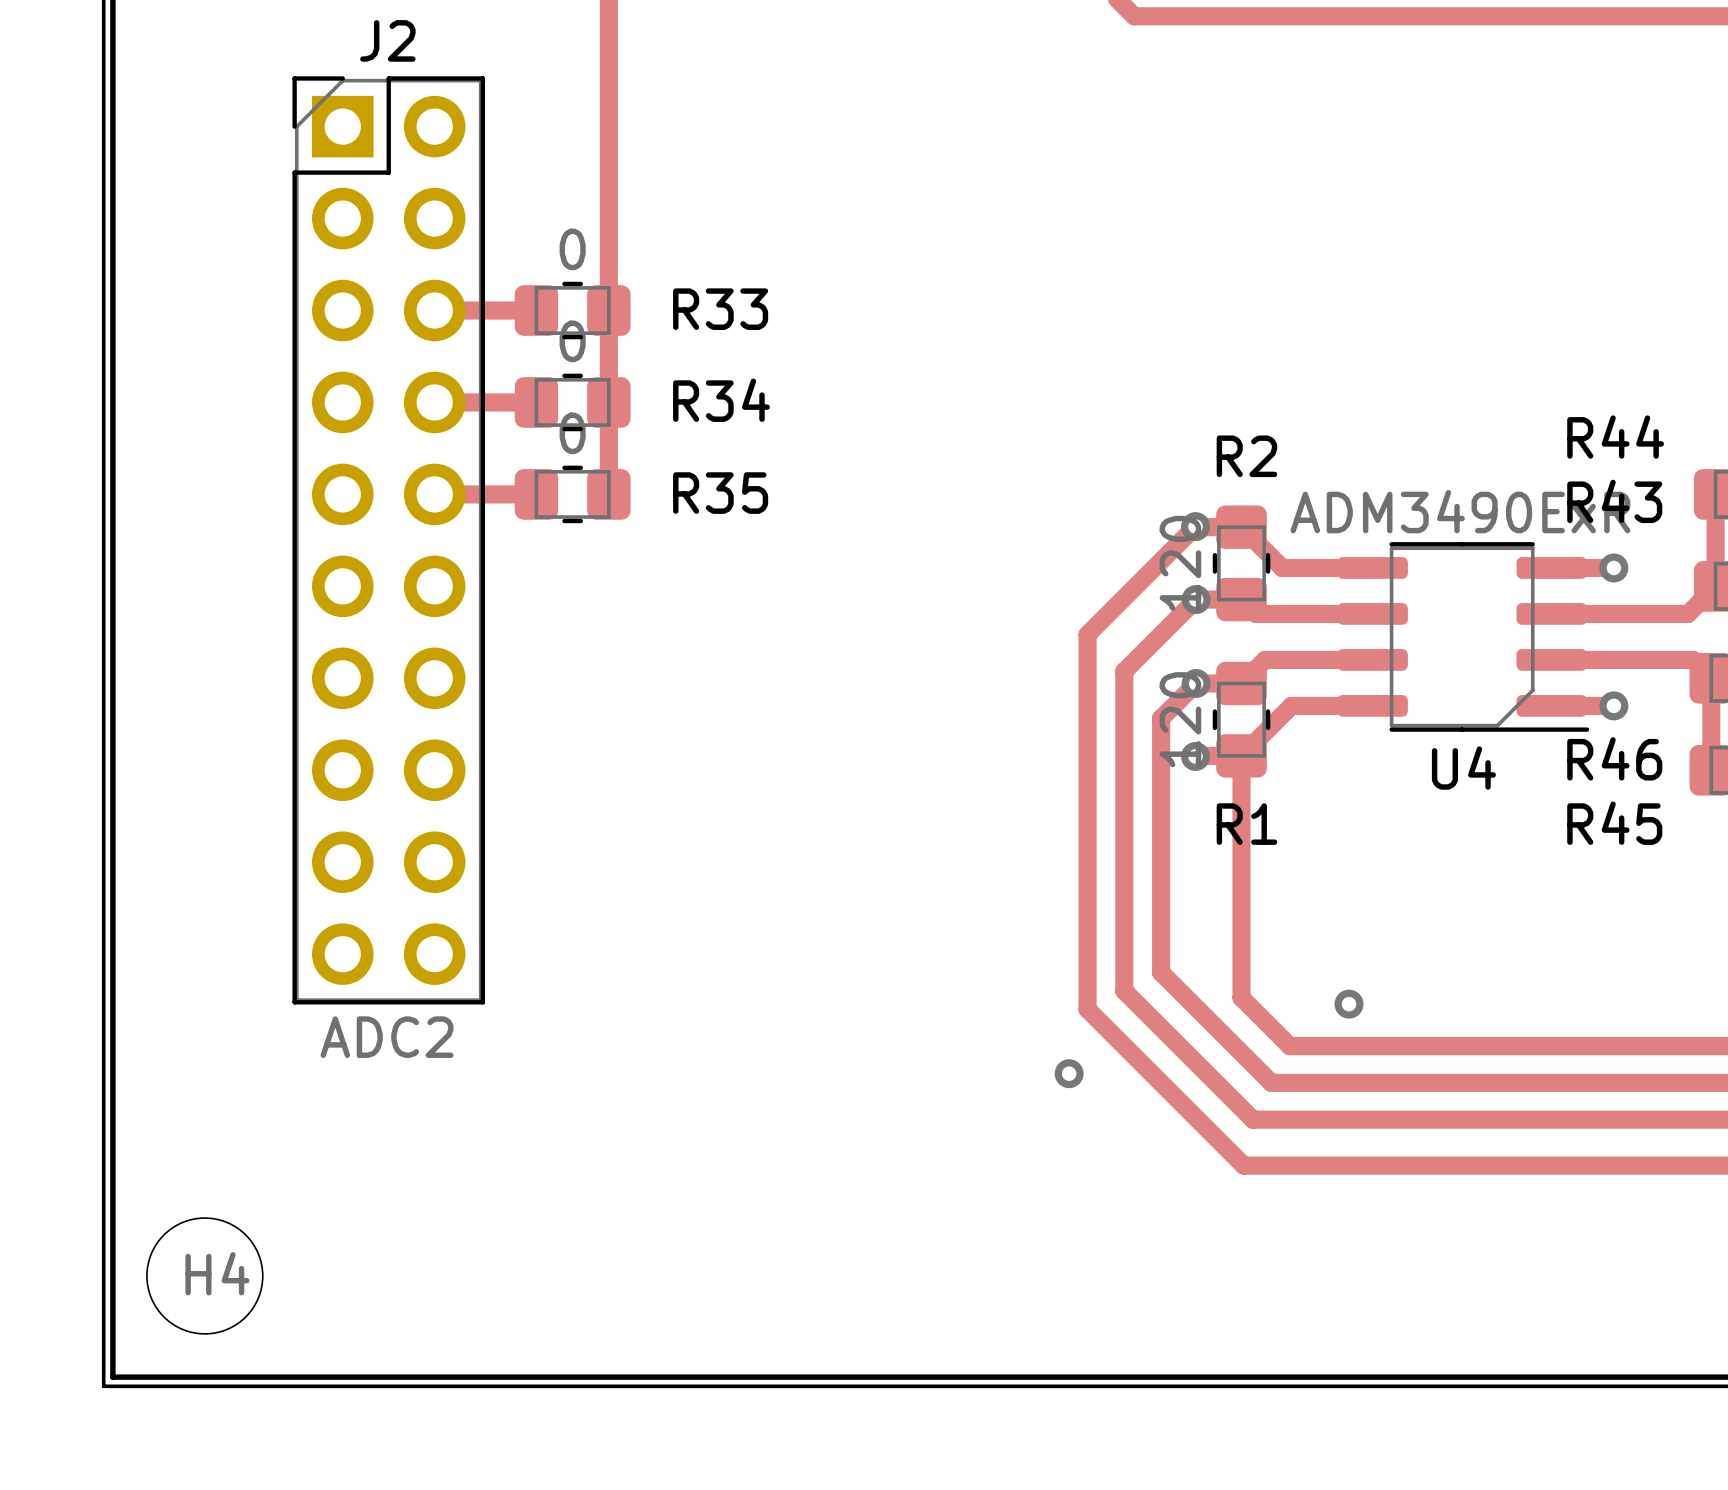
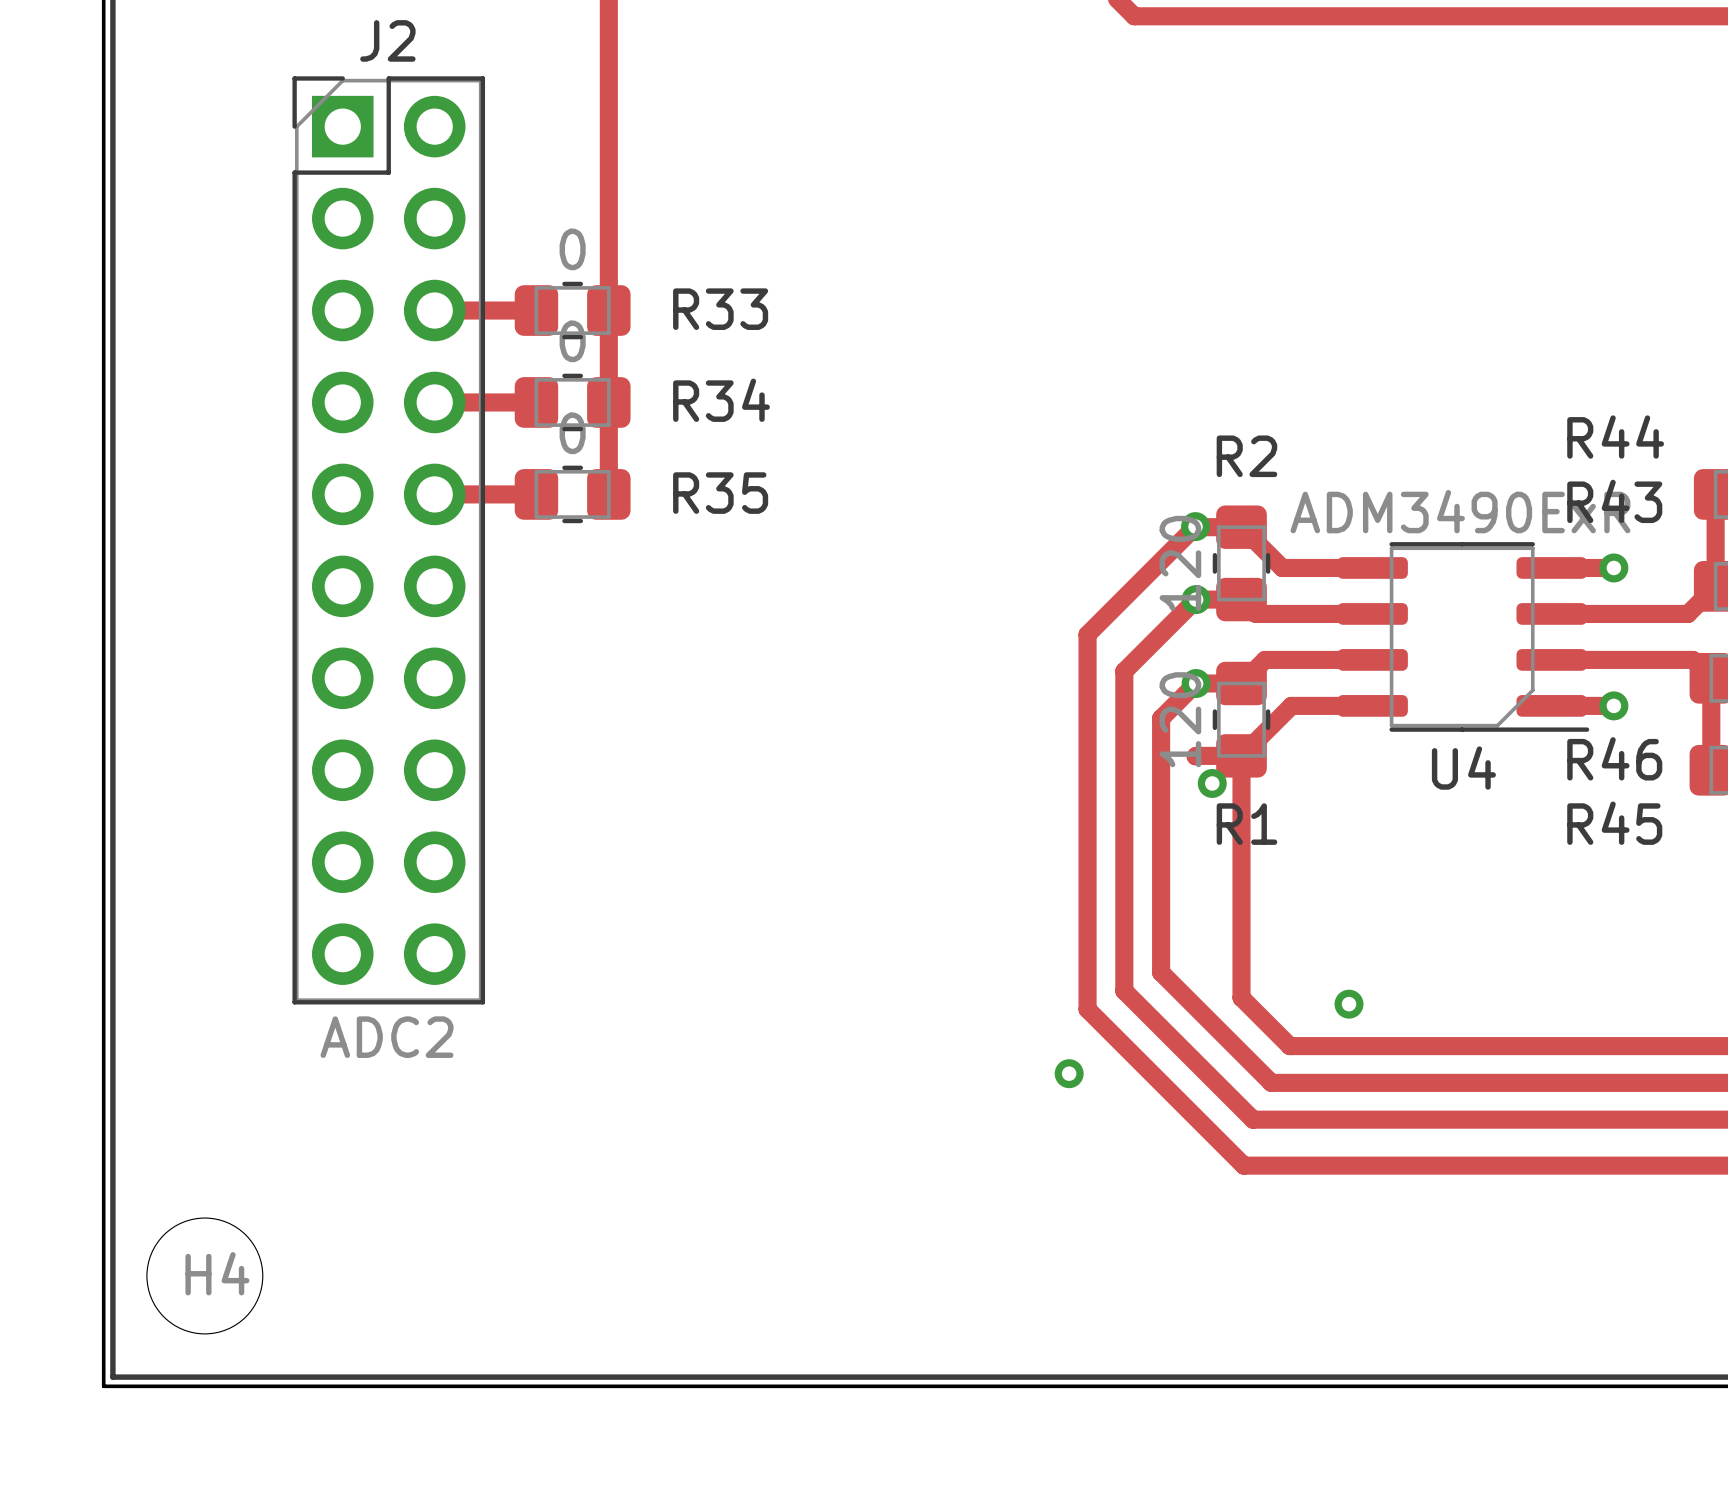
via position: (1195, 756) -> (1212, 783)

